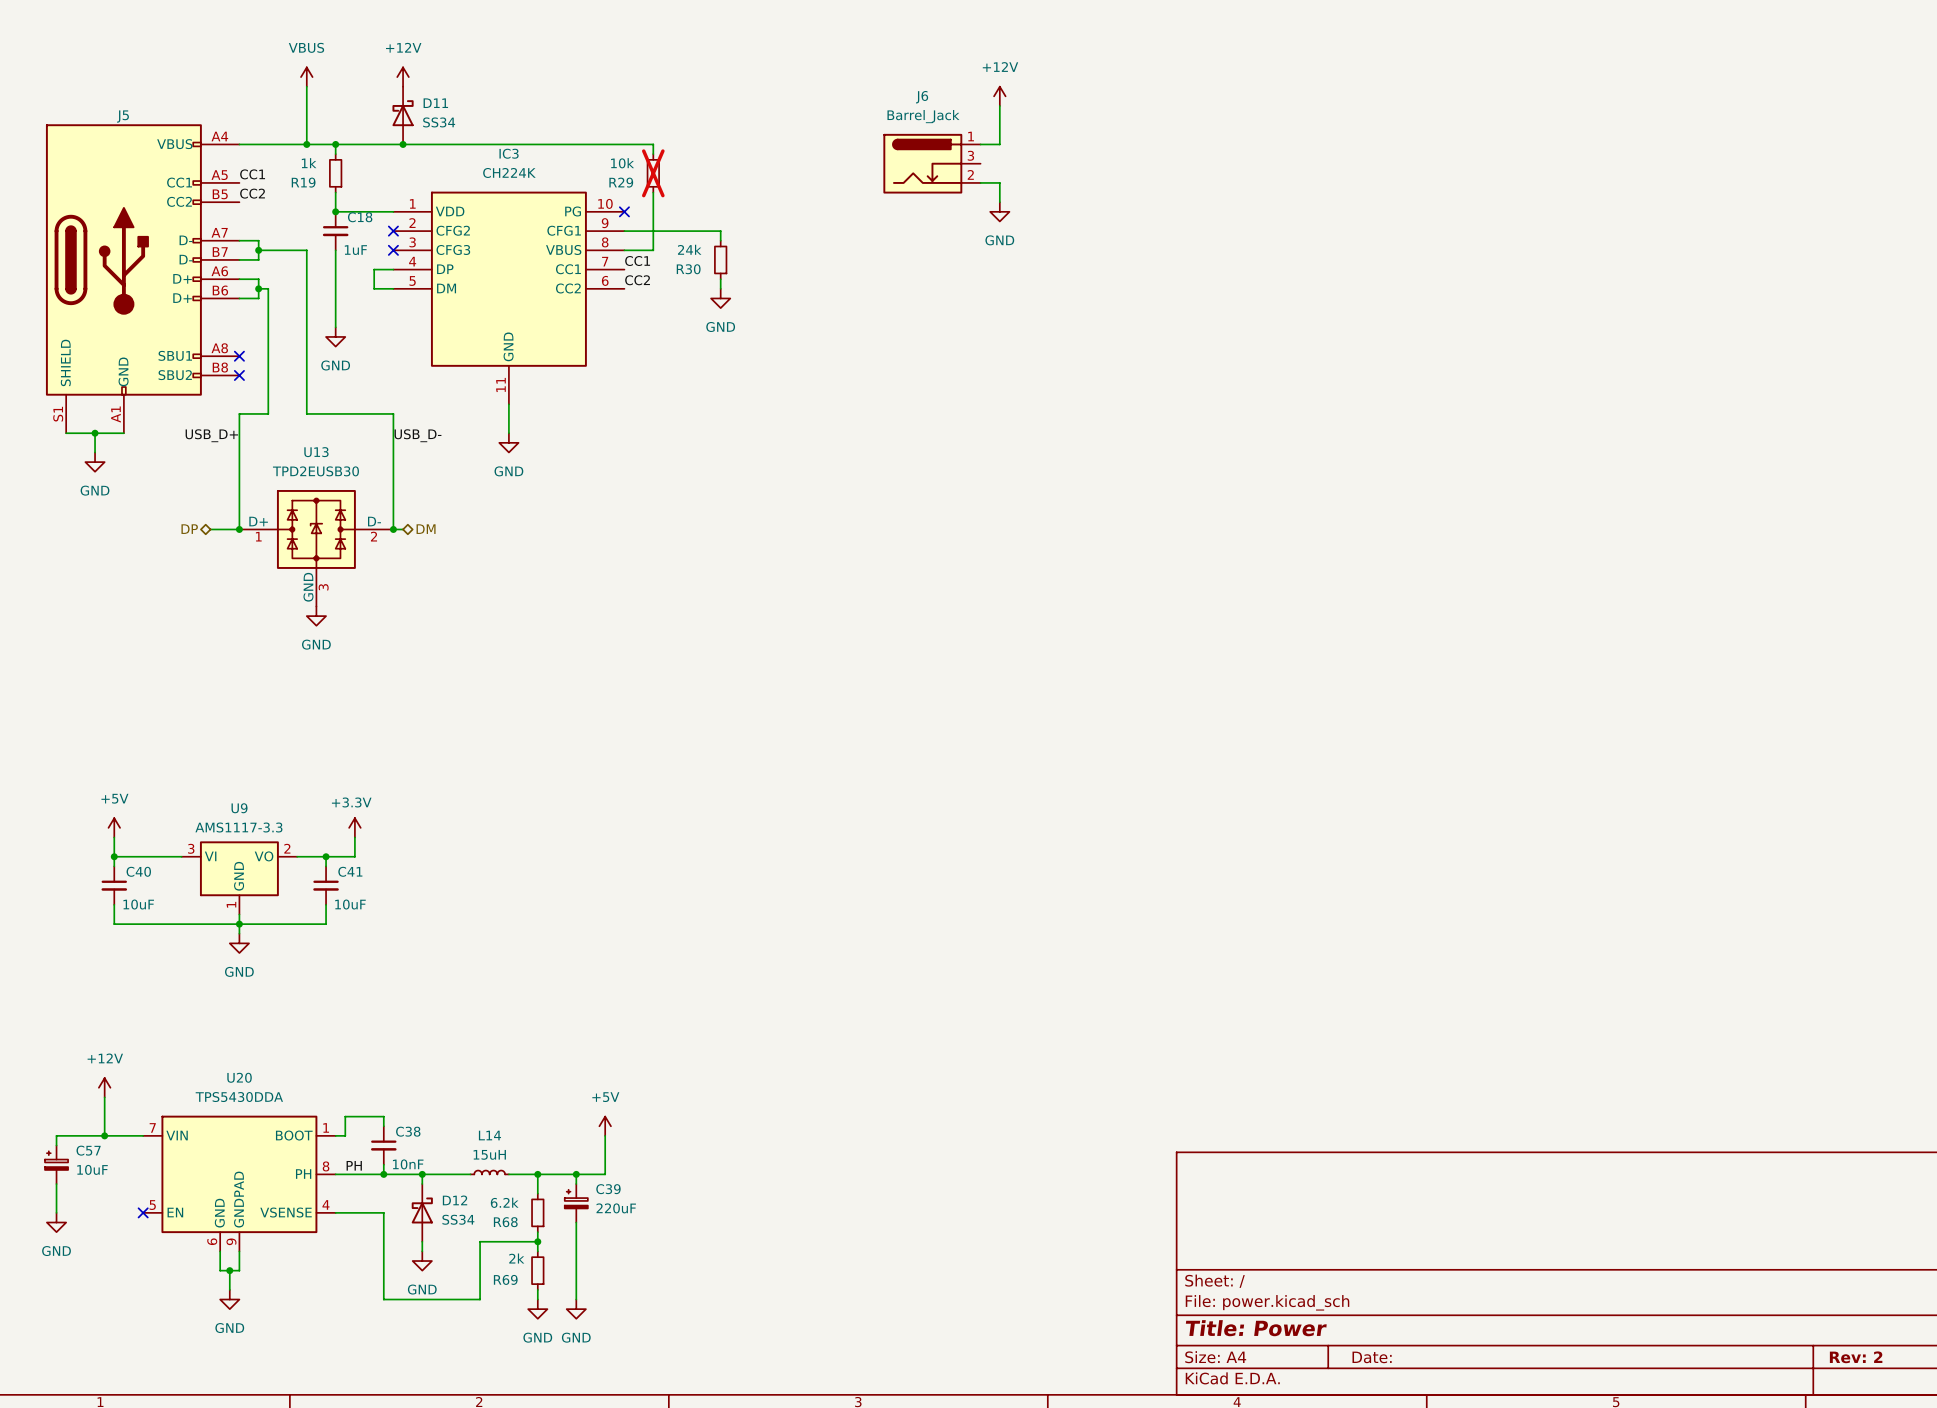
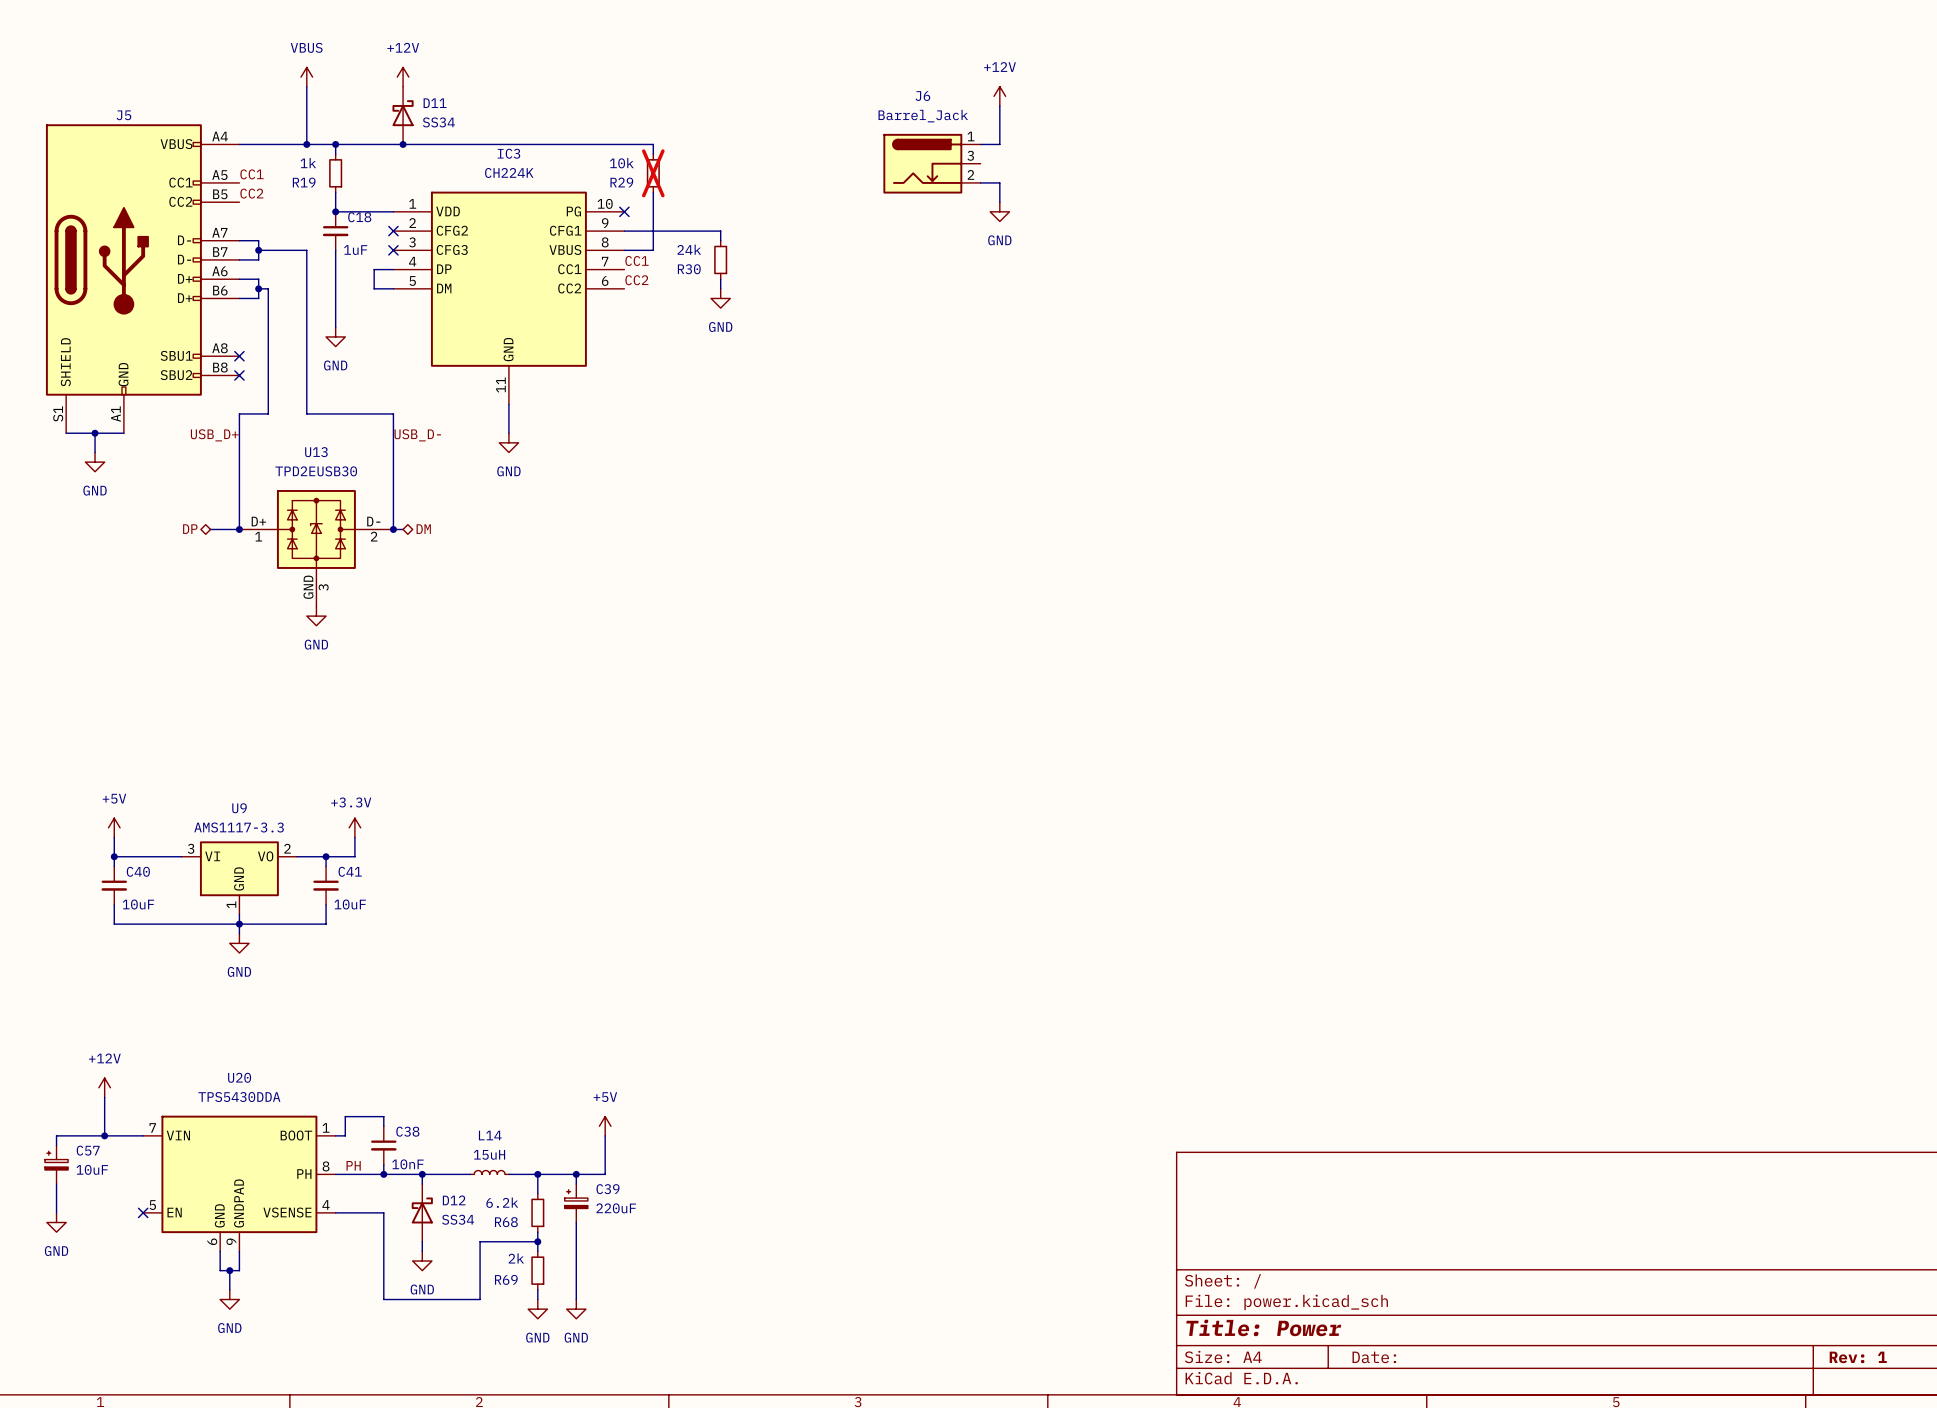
title block: Rev: 2 (1856, 1357) -> Rev: 1 (1858, 1357)

